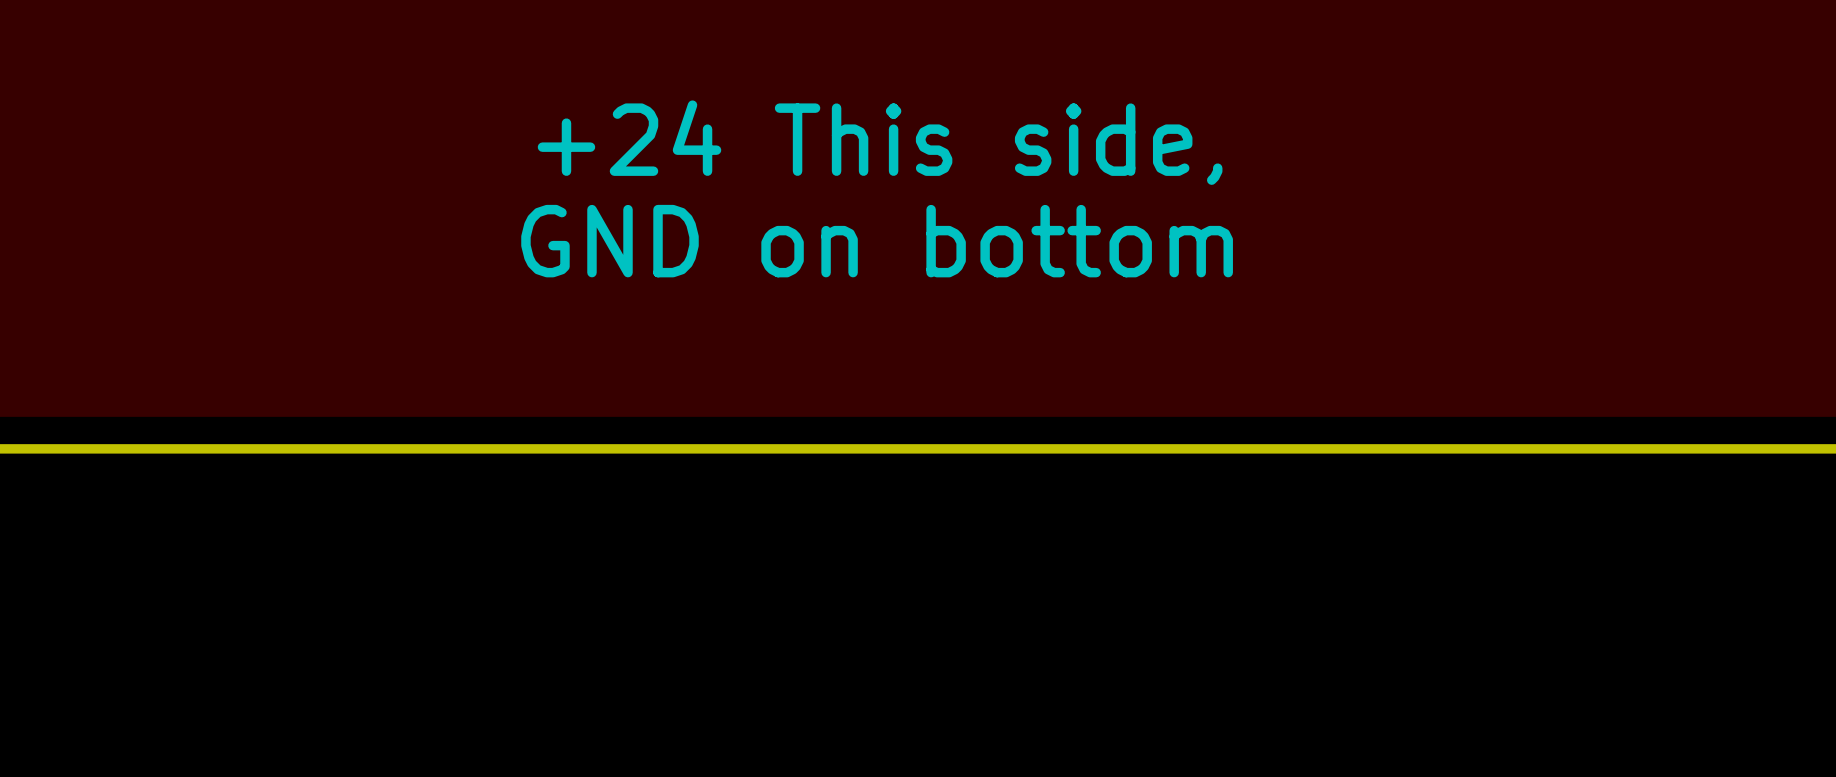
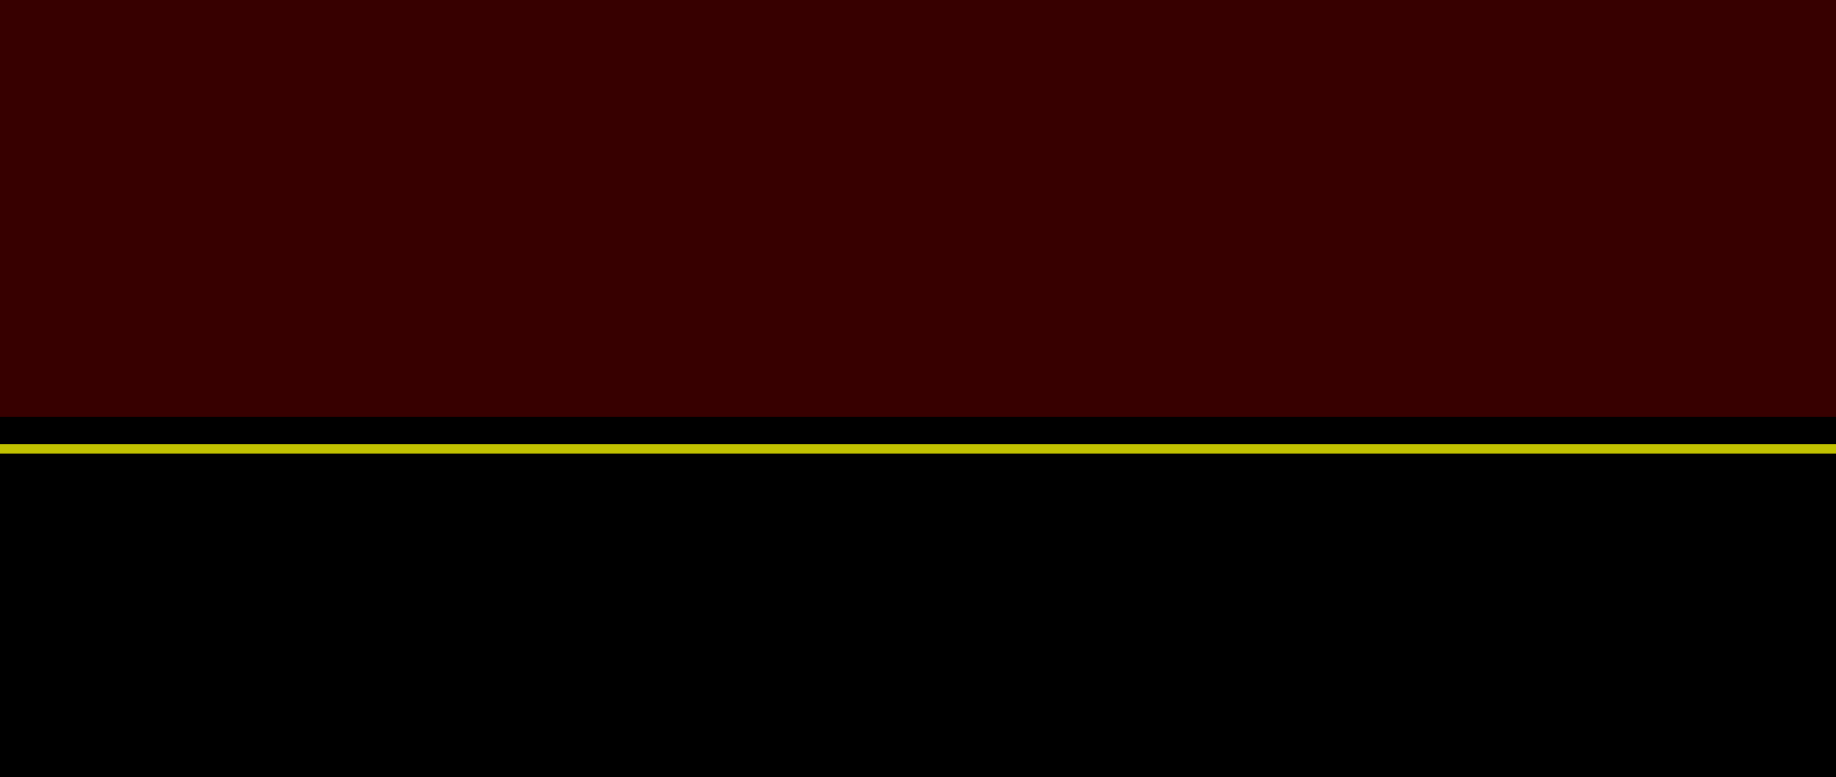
text: +24 This side, (880, 142) -> none
text: GND on bottom (877, 241) -> none

